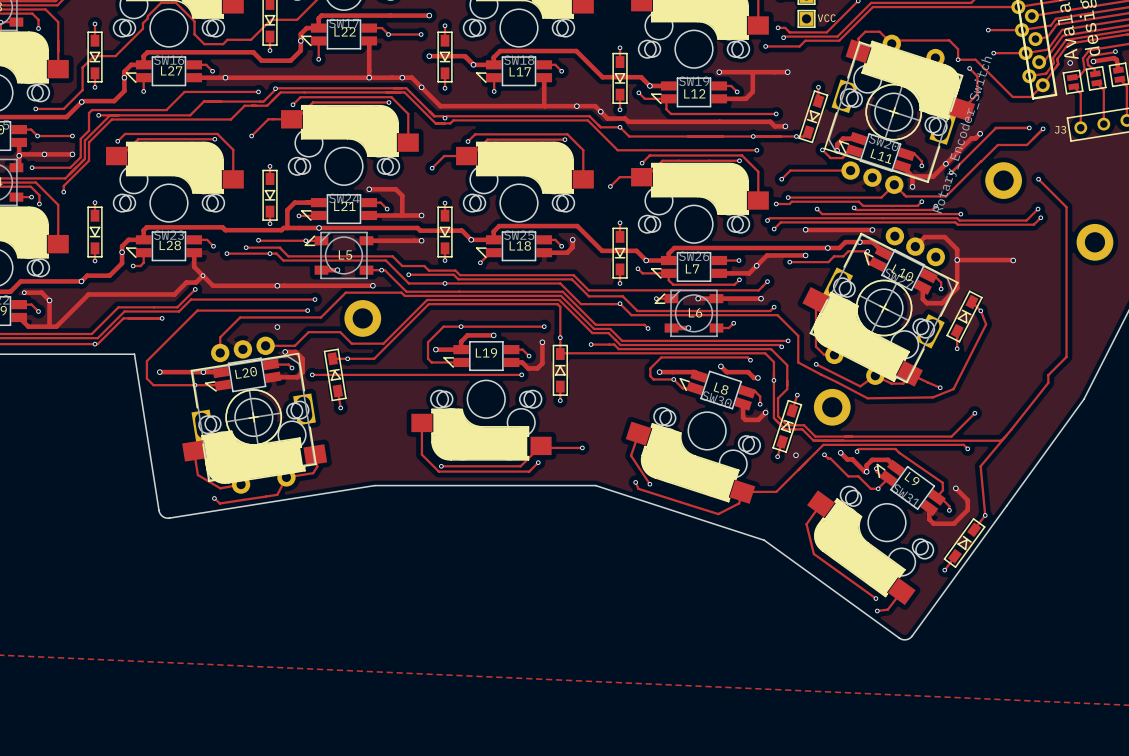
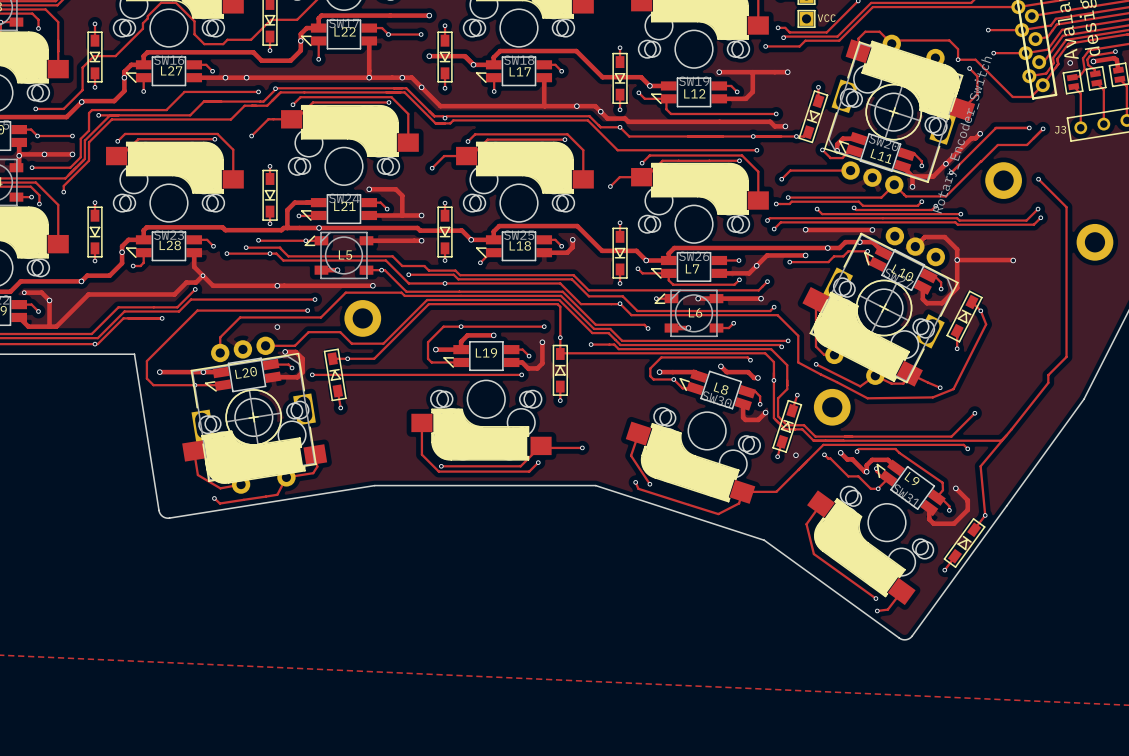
via: none -> (246, 77)

